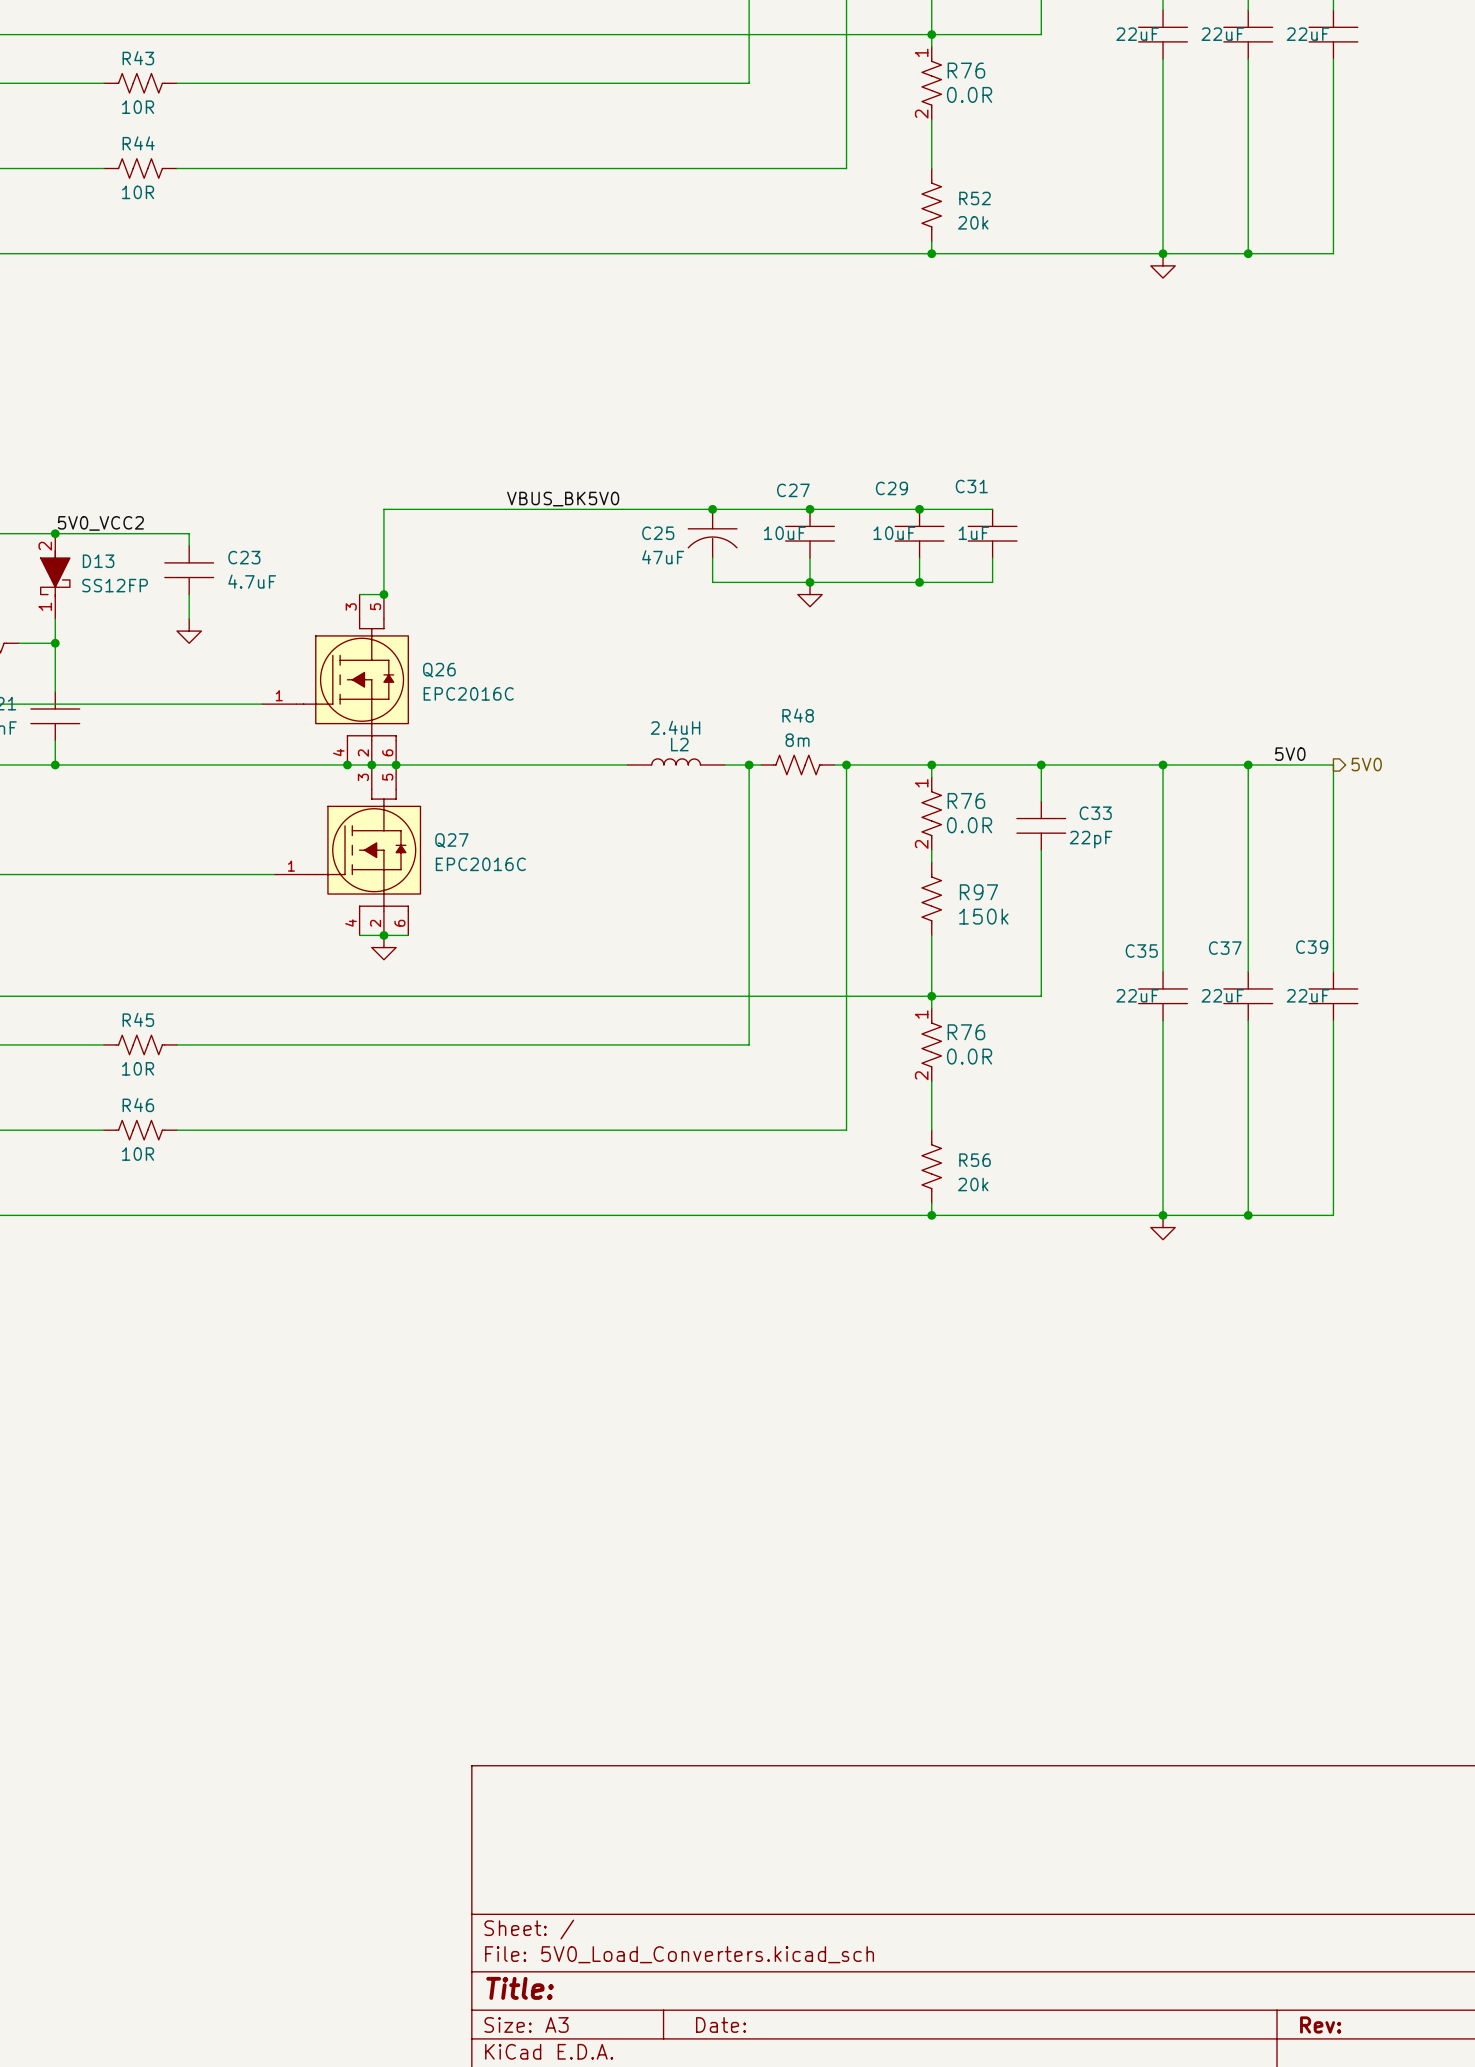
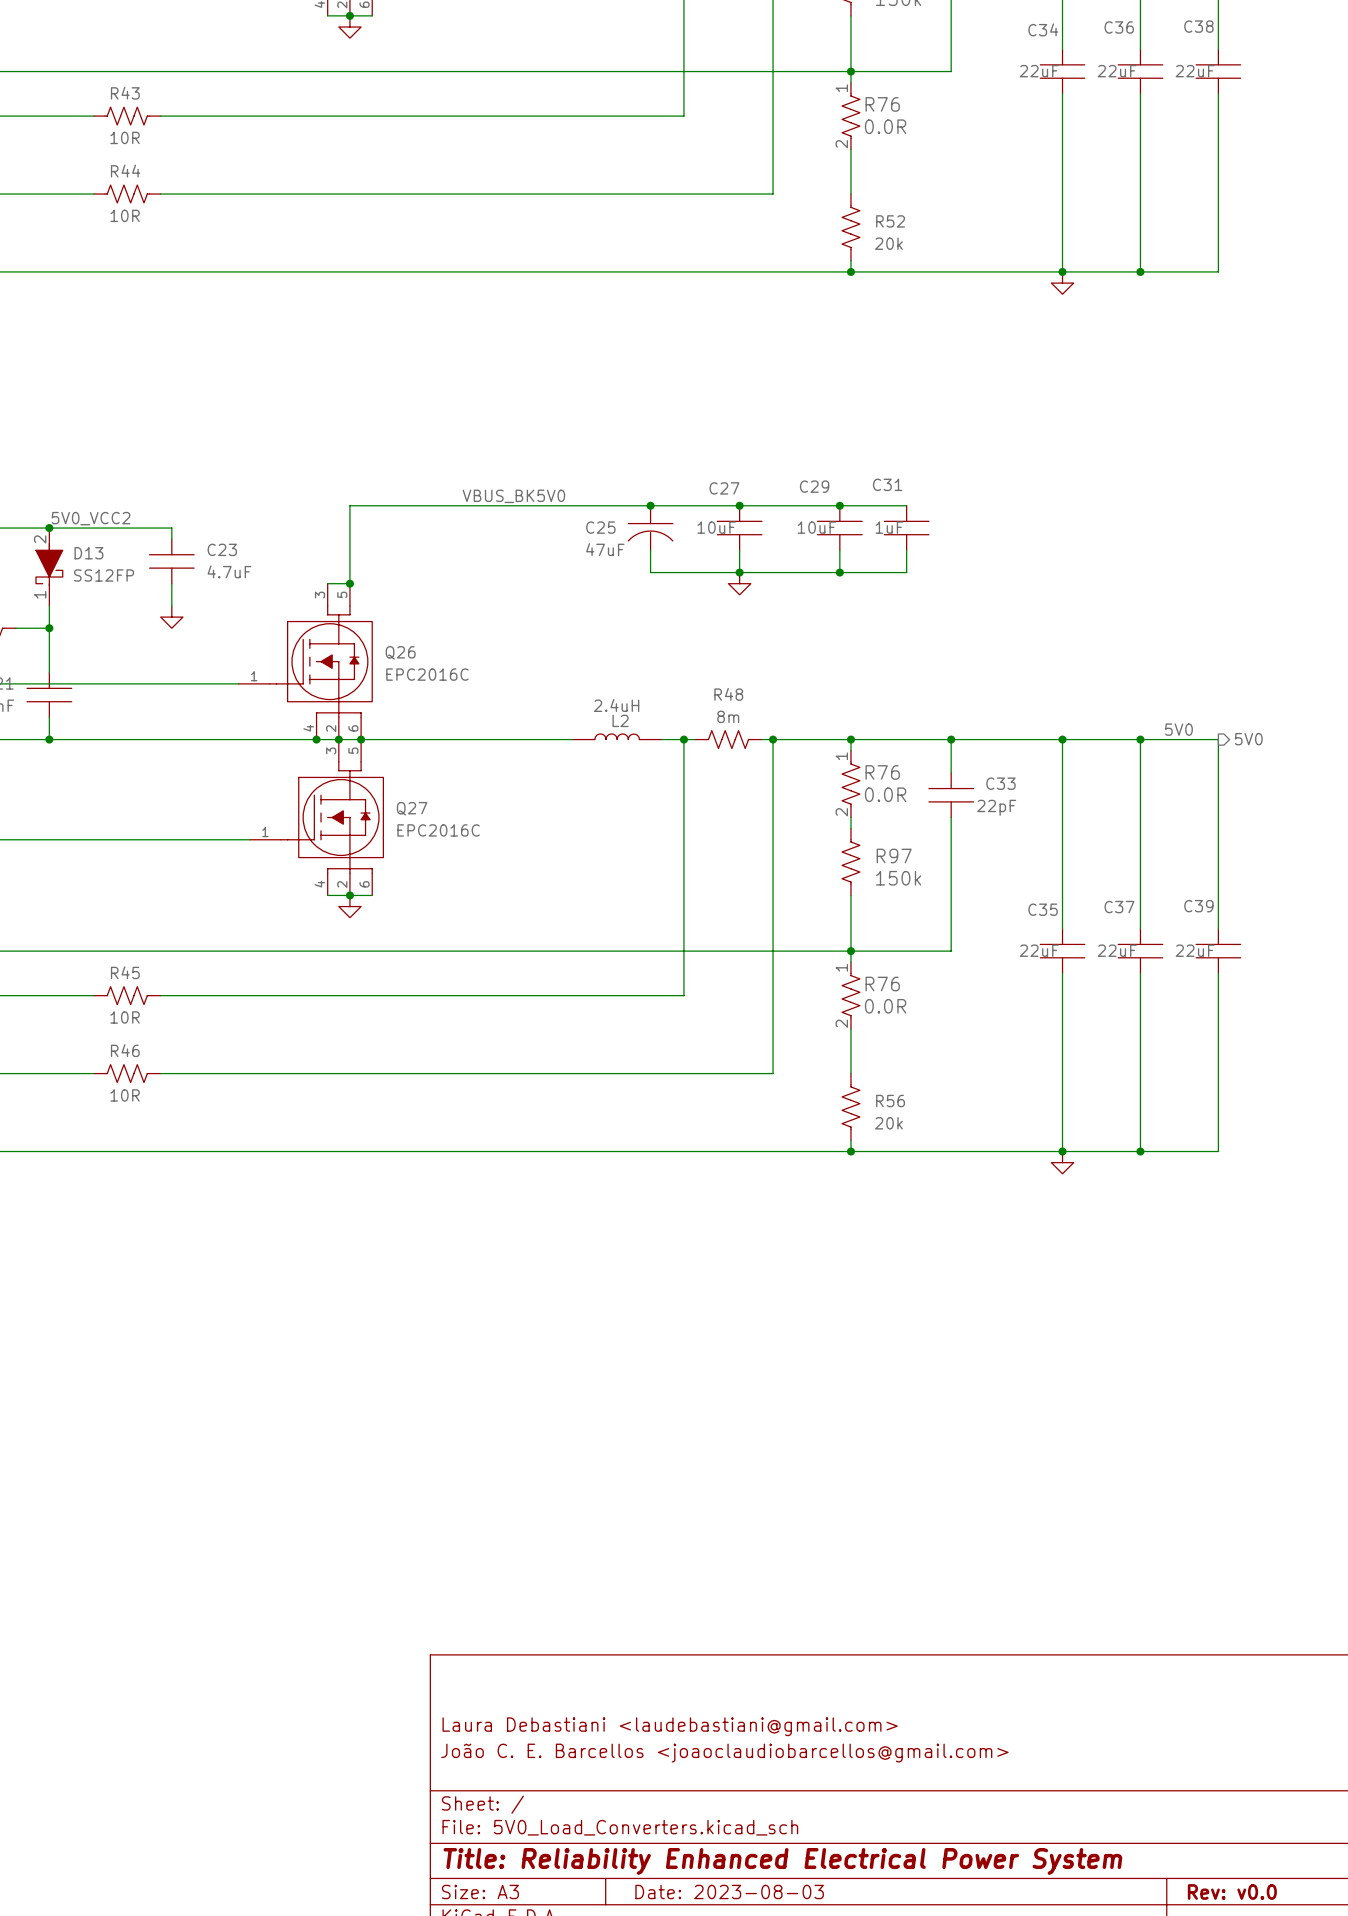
title block: none -> Laura Debastiani <laudebastiani@gmail.com> (670, 1726)
title block: none -> João C. E. Barcellos <joaoclaudiobarcellos@gmail.com> (724, 1753)
title block: Title: (520, 1988) -> Title: Reliability Enhanced Electrical Power System (782, 1861)
title block: Date: (720, 2024) -> Date: 2023-08-03 (729, 1891)
title block: Rev: (1320, 2024) -> Rev: v0.0 (1232, 1891)

